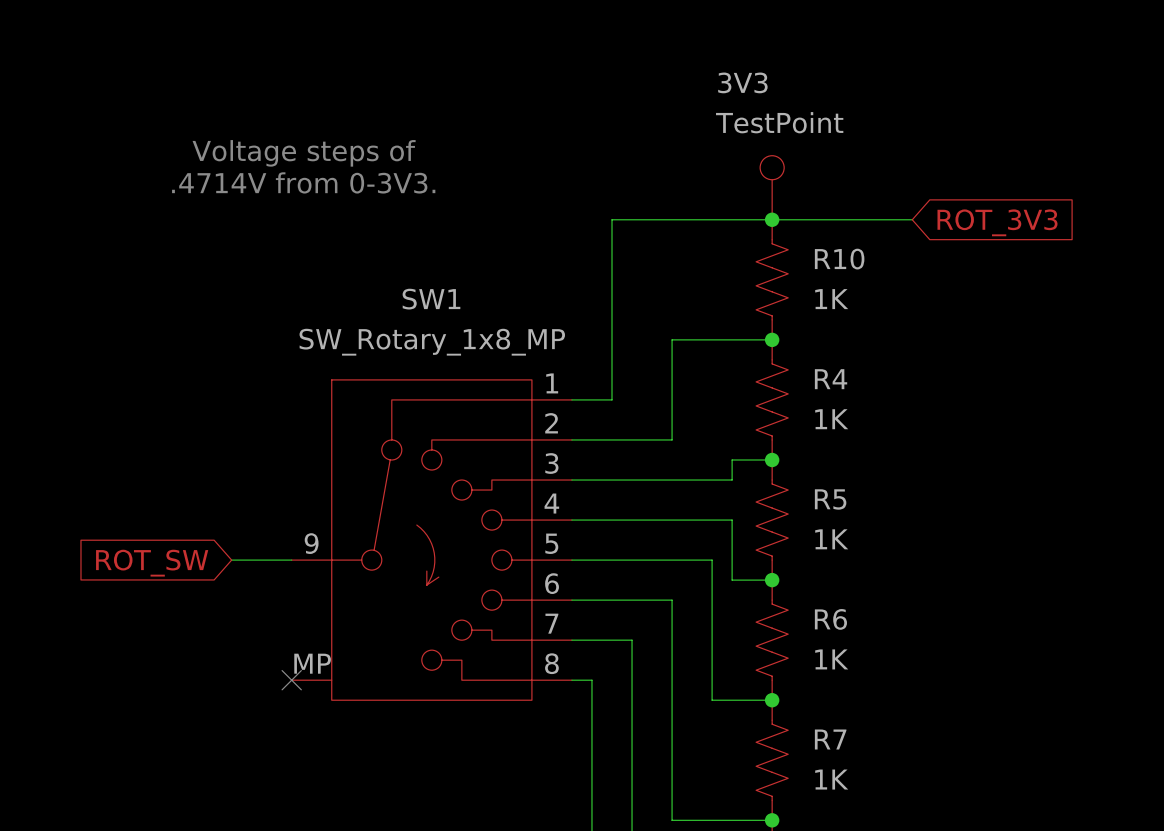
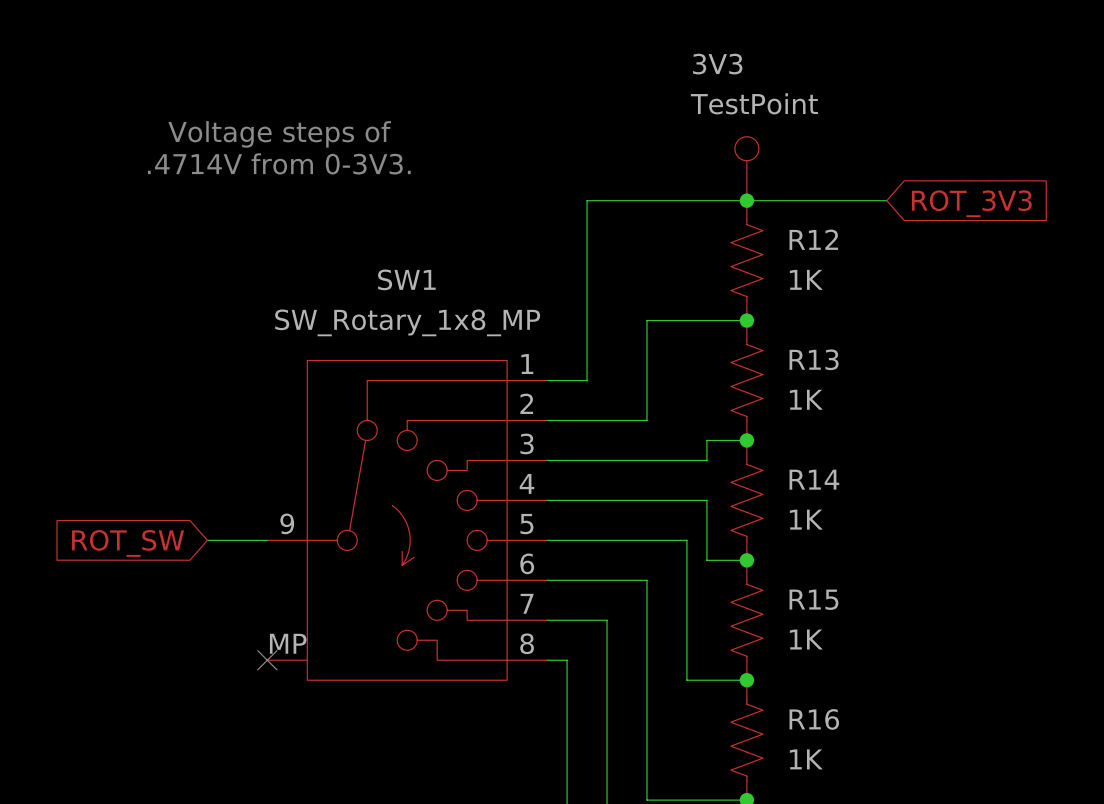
R10 name: R10 (839, 259) -> R12 (813, 239)
R4 name: R4 (831, 379) -> R13 (814, 359)
R5 name: R5 (830, 499) -> R14 (814, 479)
R6 name: R6 (830, 619) -> R15 (813, 599)
R7 name: R7 (830, 739) -> R16 (814, 719)

